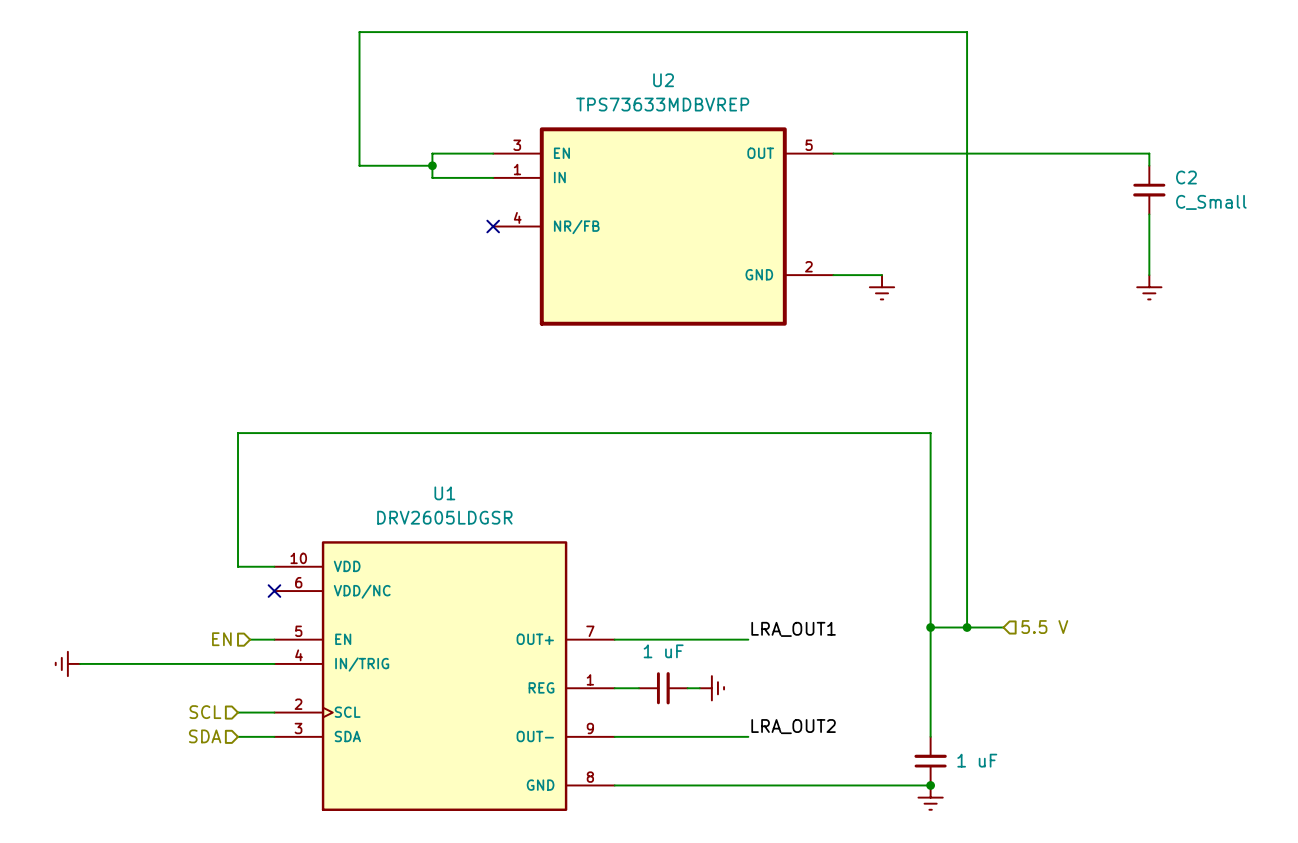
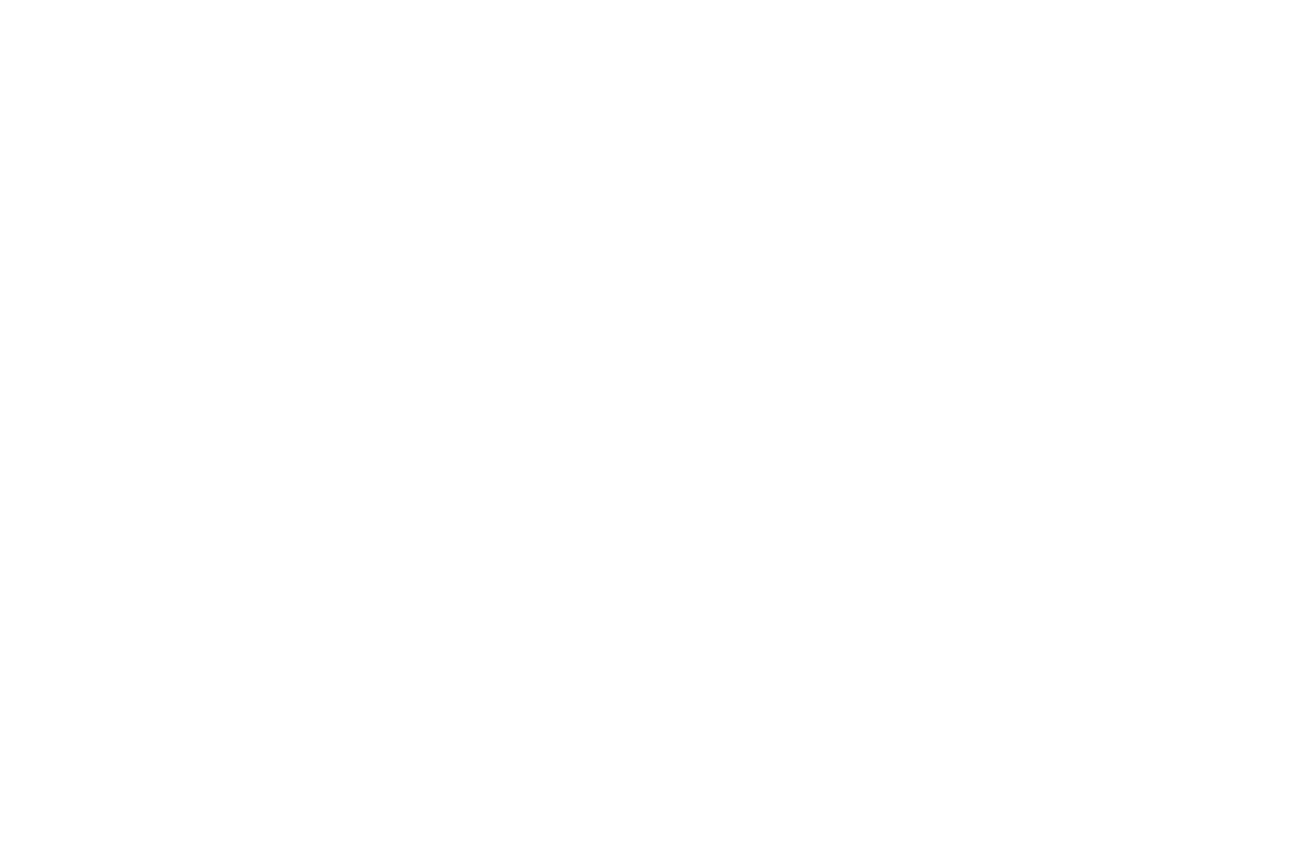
wire: (493, 153) (432, 153) (432, 177) (493, 177) -> none
wire: (833, 153) (1149, 153) (1149, 165) -> none
wire: (432, 165) (359, 165) (359, 32) (967, 32) (967, 627) -> none
junction: (432, 165) -> none
C2: C_Small (1149, 190) -> none
wire: (1149, 214) (1149, 275) -> none
no-connect mark: (493, 226) -> none
U2: TPS73633MDBVREP (663, 226) -> none
wire: (833, 275) (882, 275) -> none
power symbol: (882, 287) -> none
power symbol: (1149, 287) -> none
wire: (274, 566) (238, 566) (238, 433) (930, 433) (930, 736) -> none
no-connect mark: (274, 591) -> none
wire: (930, 627) (1003, 627) -> none
junction: (930, 627) -> none
junction: (967, 627) -> none
hierarchical label: 5.5 V (1044, 627) -> none
label: LRA_OUT1 (793, 629) -> none
hierarchical label: EN (221, 639) -> none
wire: (250, 639) (274, 639) -> none
wire: (614, 639) (748, 639) -> none
power symbol: (67, 663) -> none
wire: (80, 663) (274, 663) -> none
U1: DRV2605LDGSR (444, 676) -> none
wire: (614, 688) (638, 688) -> none
part: 1 uF (663, 688) -> none
wire: (687, 688) (699, 688) -> none
power symbol: (711, 688) -> none
hierarchical label: SCL (205, 712) -> none
wire: (238, 712) (274, 712) -> none
label: LRA_OUT2 (793, 726) -> none
hierarchical label: SDA (205, 736) -> none
wire: (238, 736) (274, 736) -> none
wire: (614, 736) (748, 736) -> none
part: 1 uF (930, 761) -> none
wire: (614, 785) (930, 785) -> none
junction: (930, 785) -> none
power symbol: (930, 797) -> none

